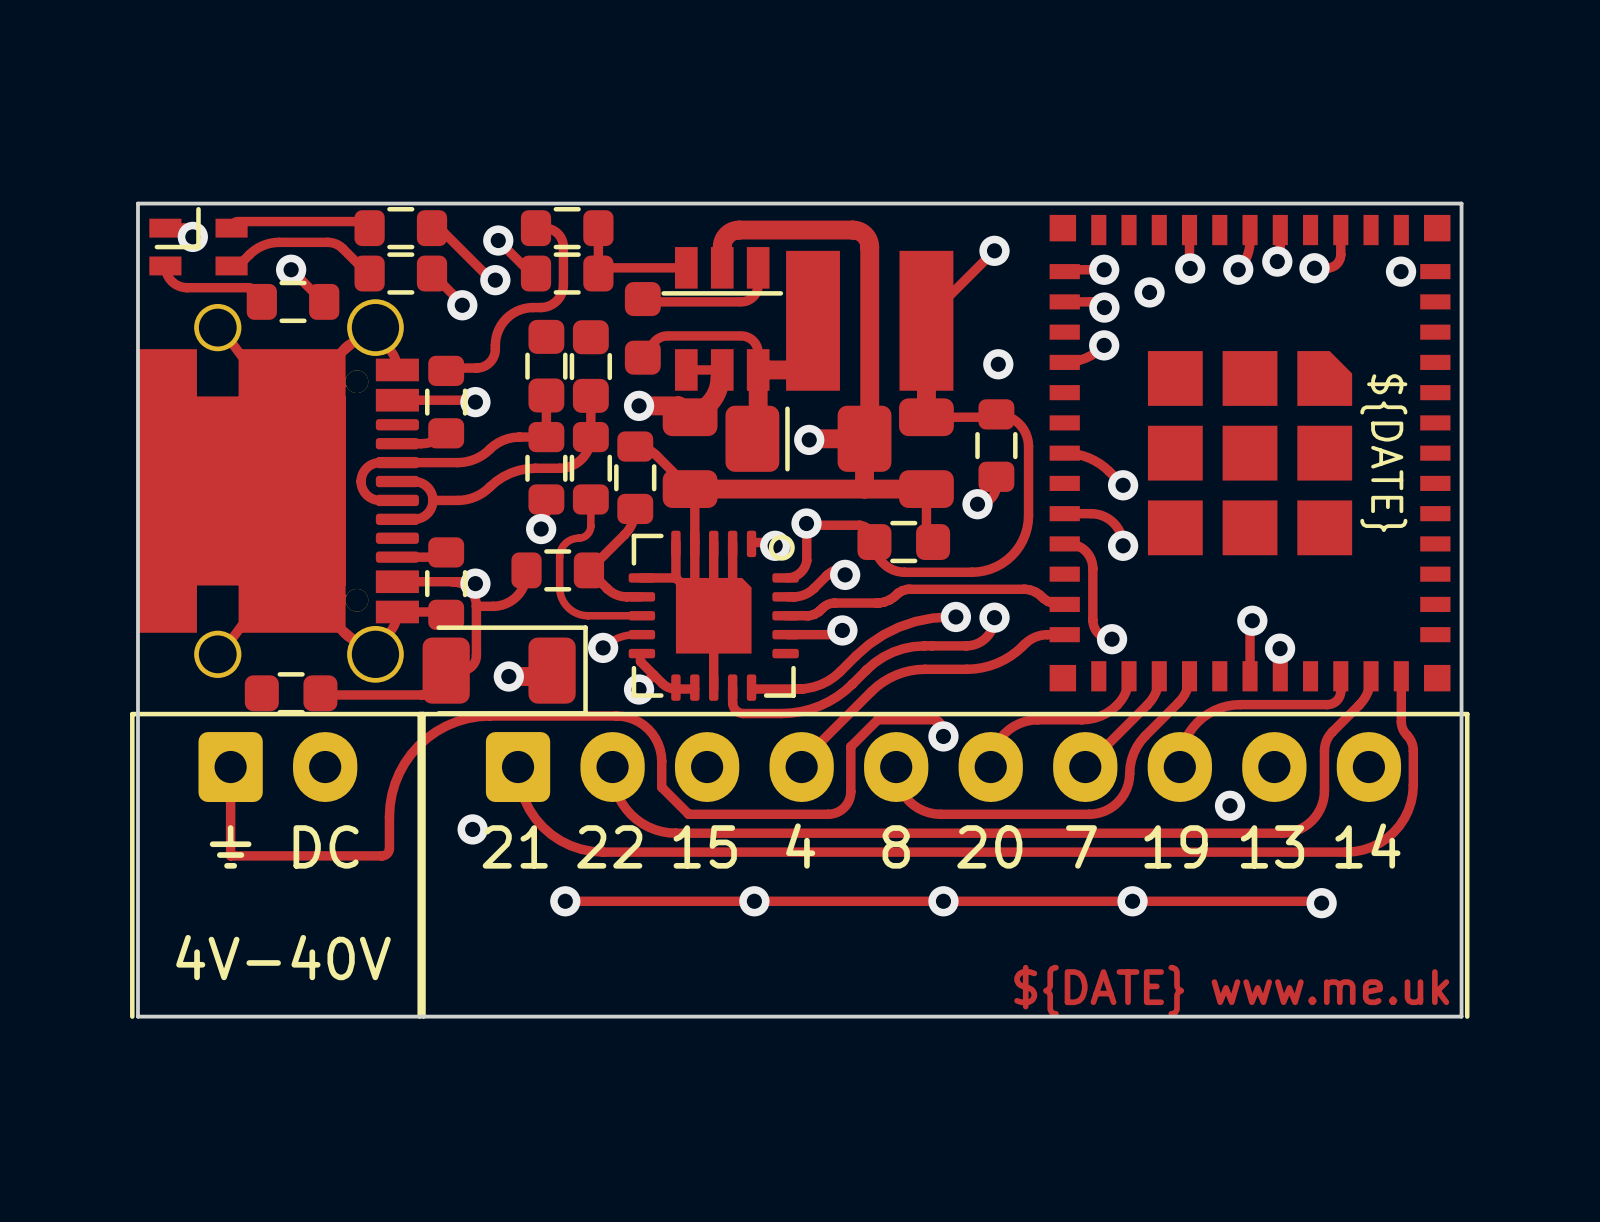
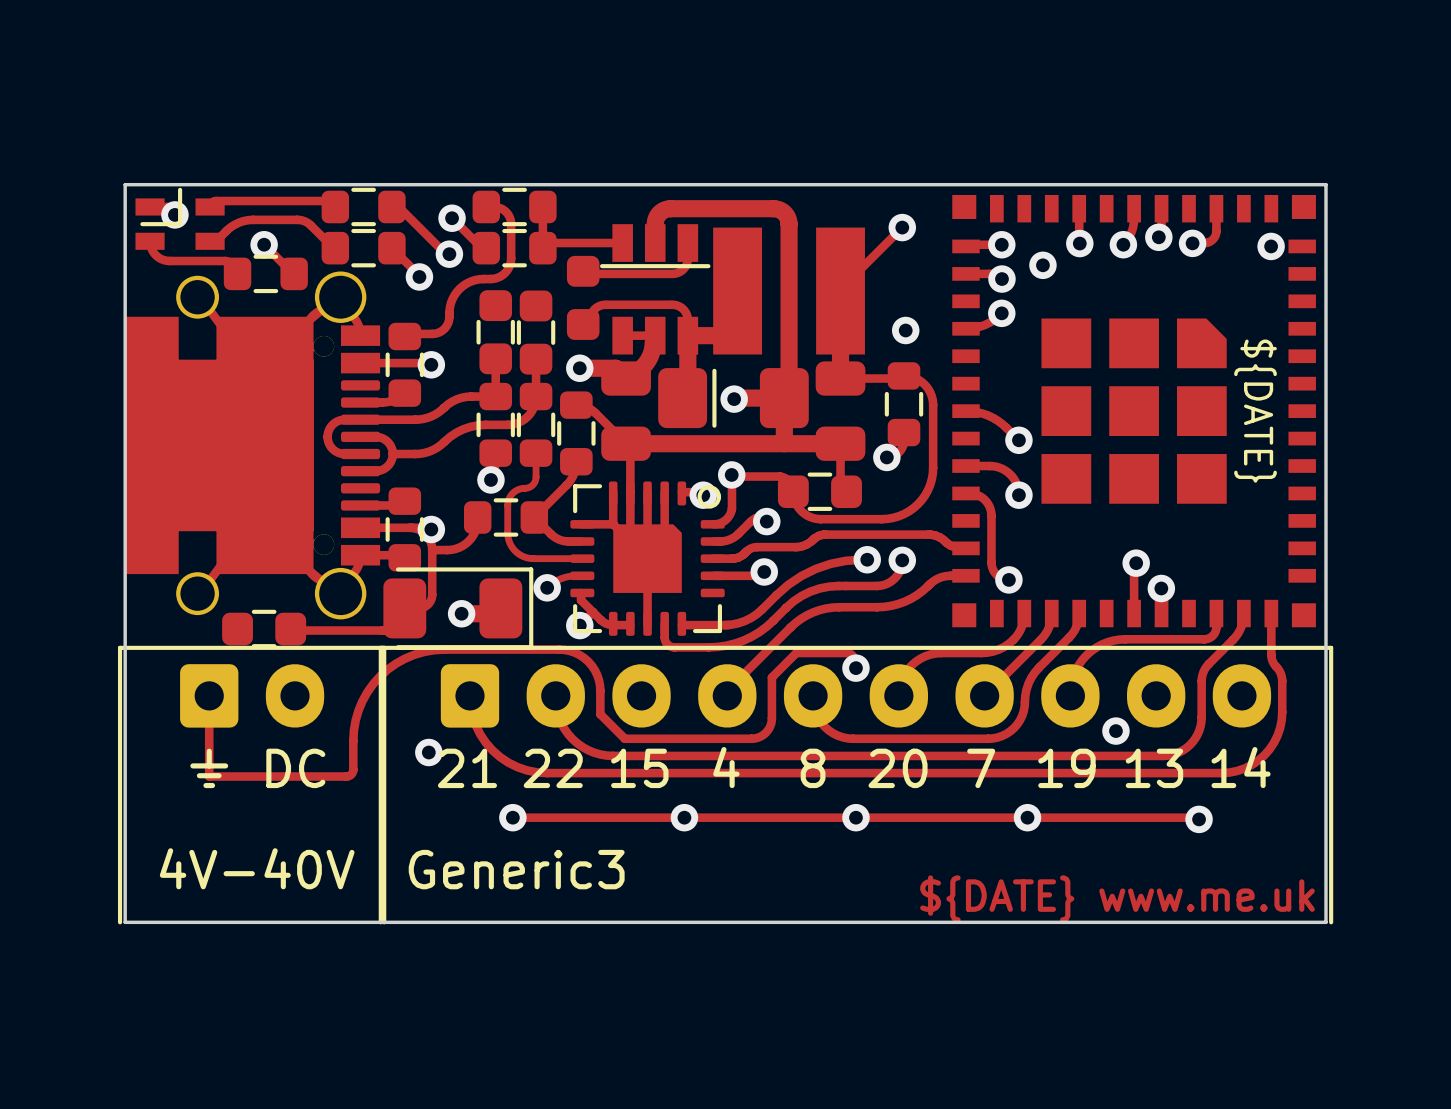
text: none -> Generic3 (516, 869)

